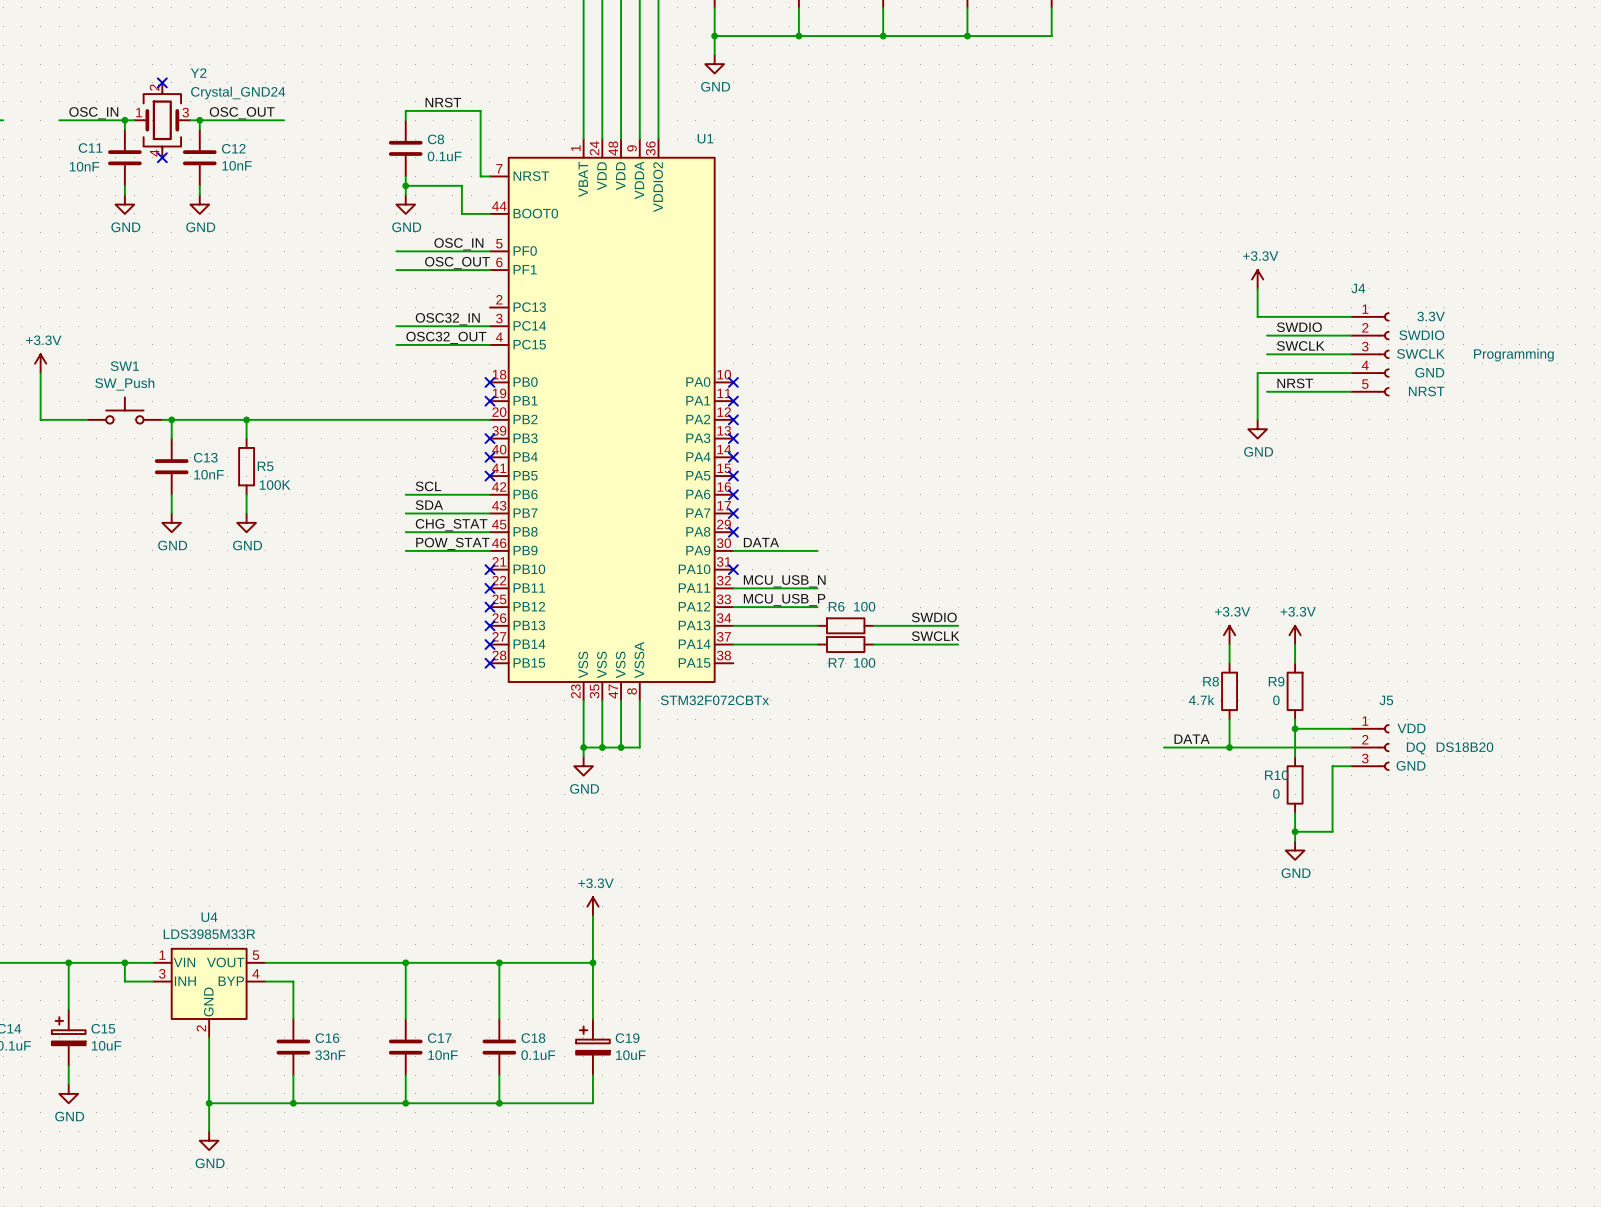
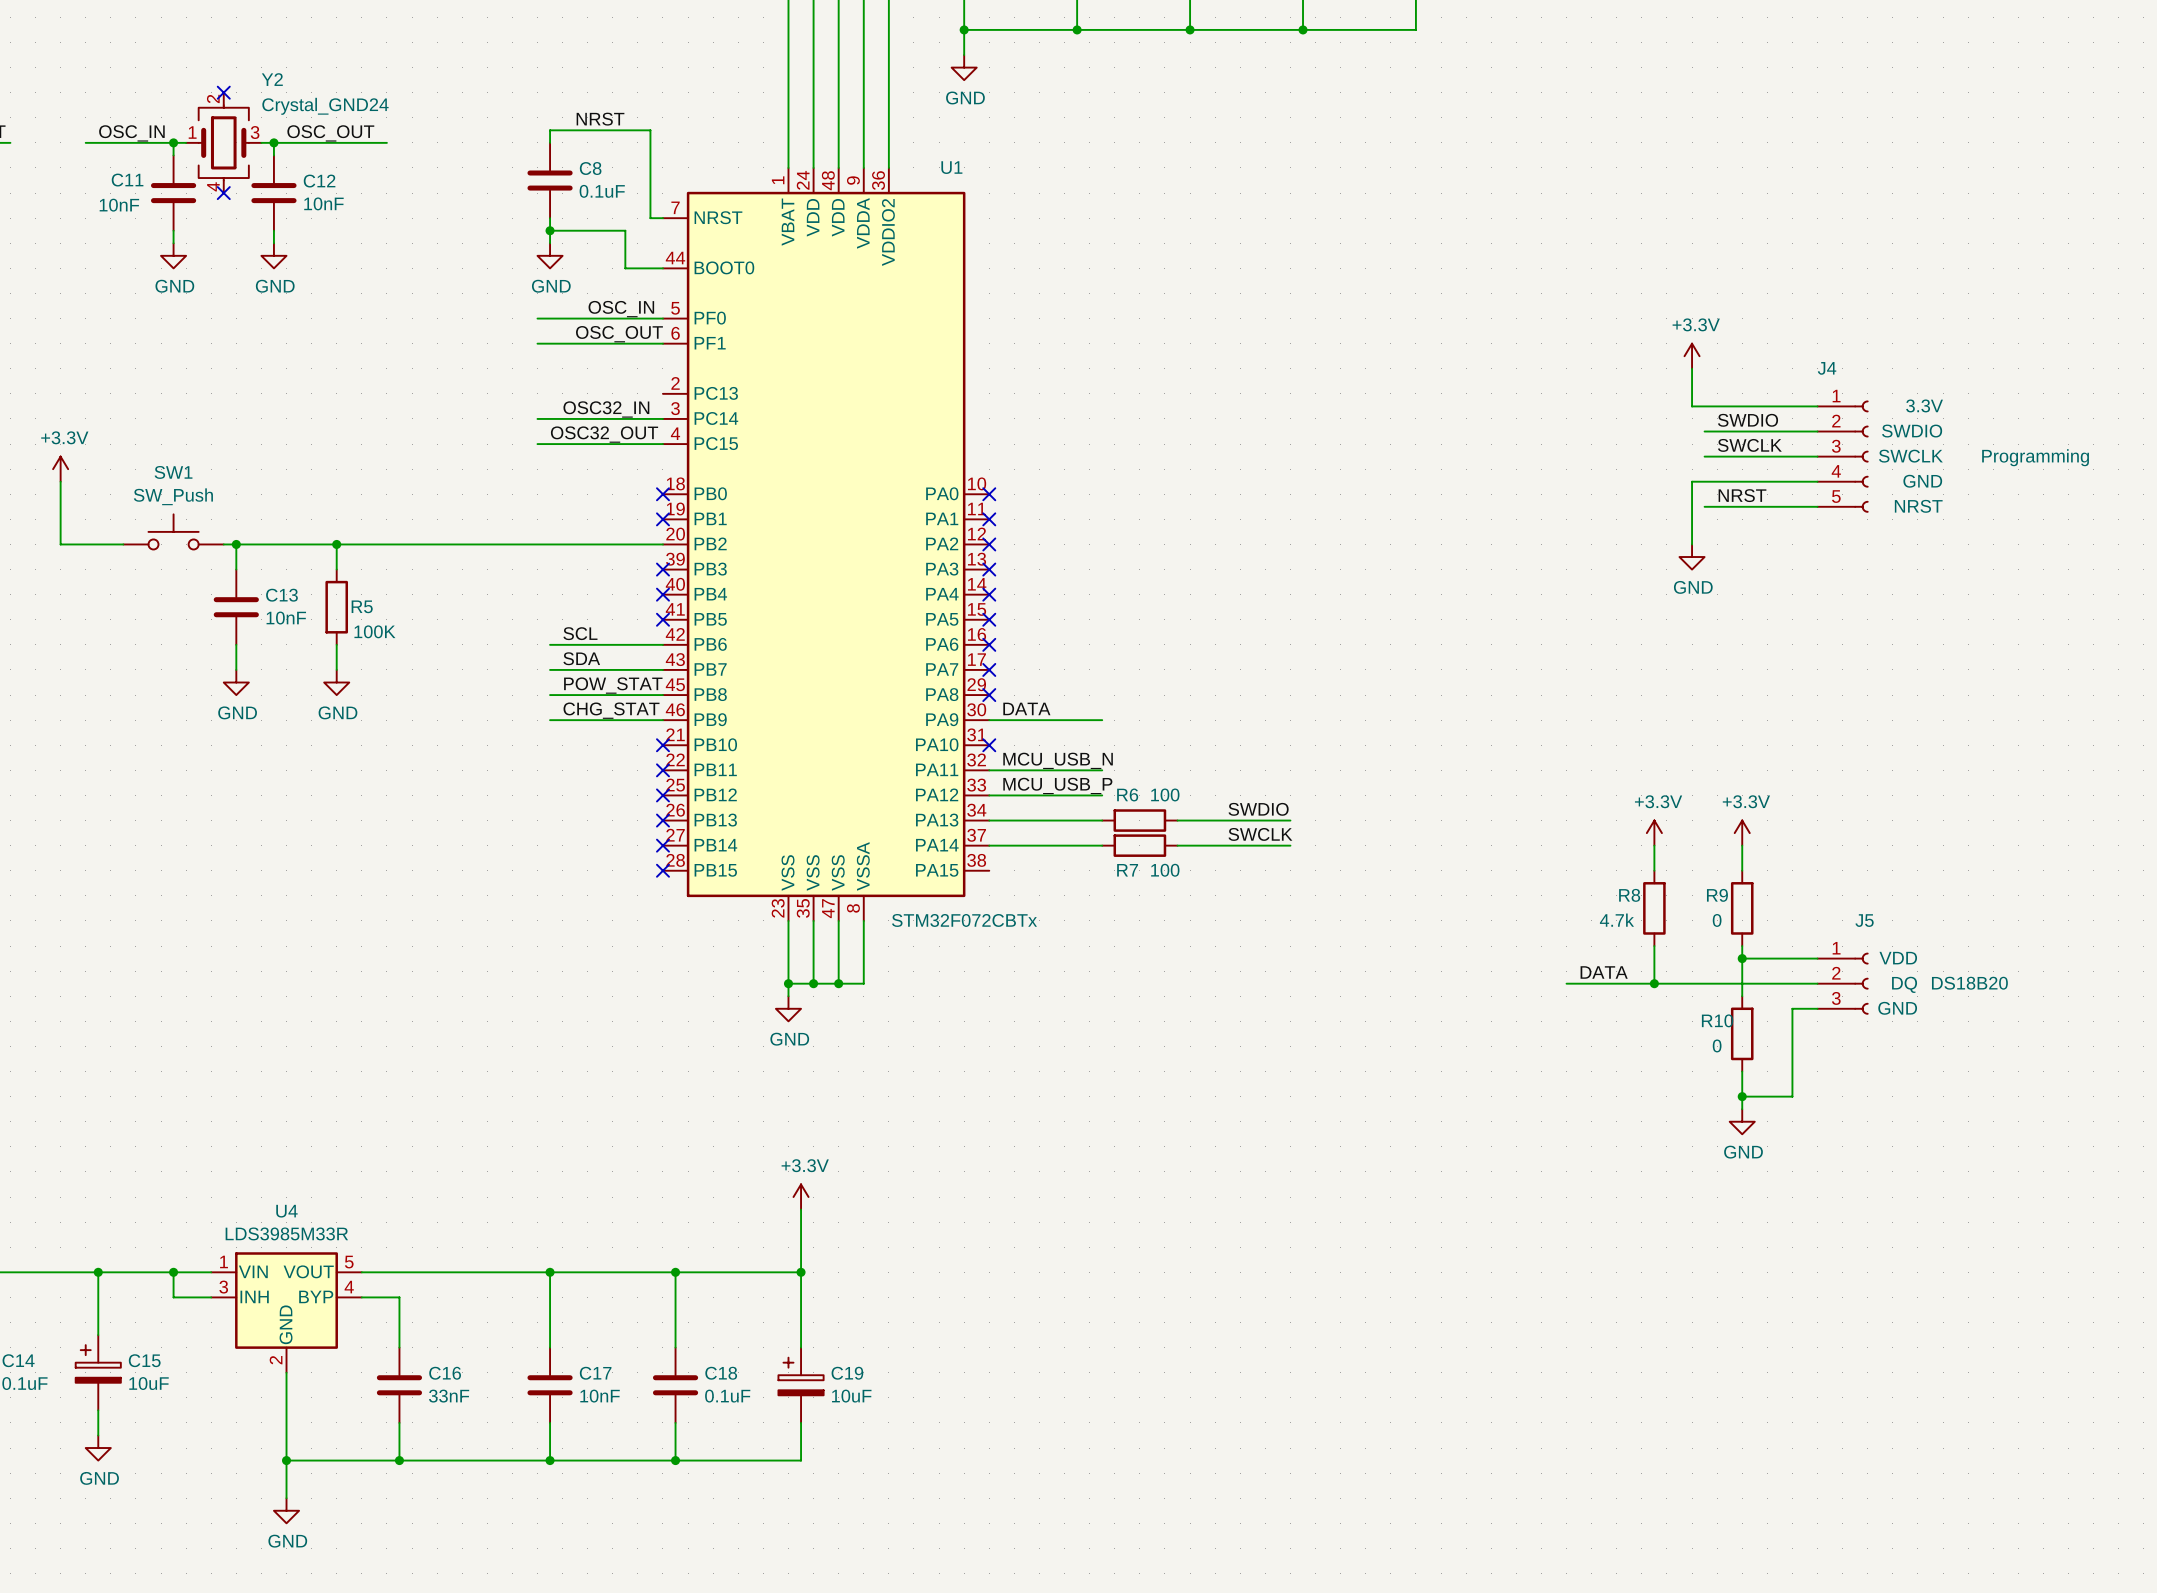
label: CHG_STAT (451, 525) -> POW_STAT (613, 685)
label: POW_STAT (452, 543) -> CHG_STAT (611, 710)

